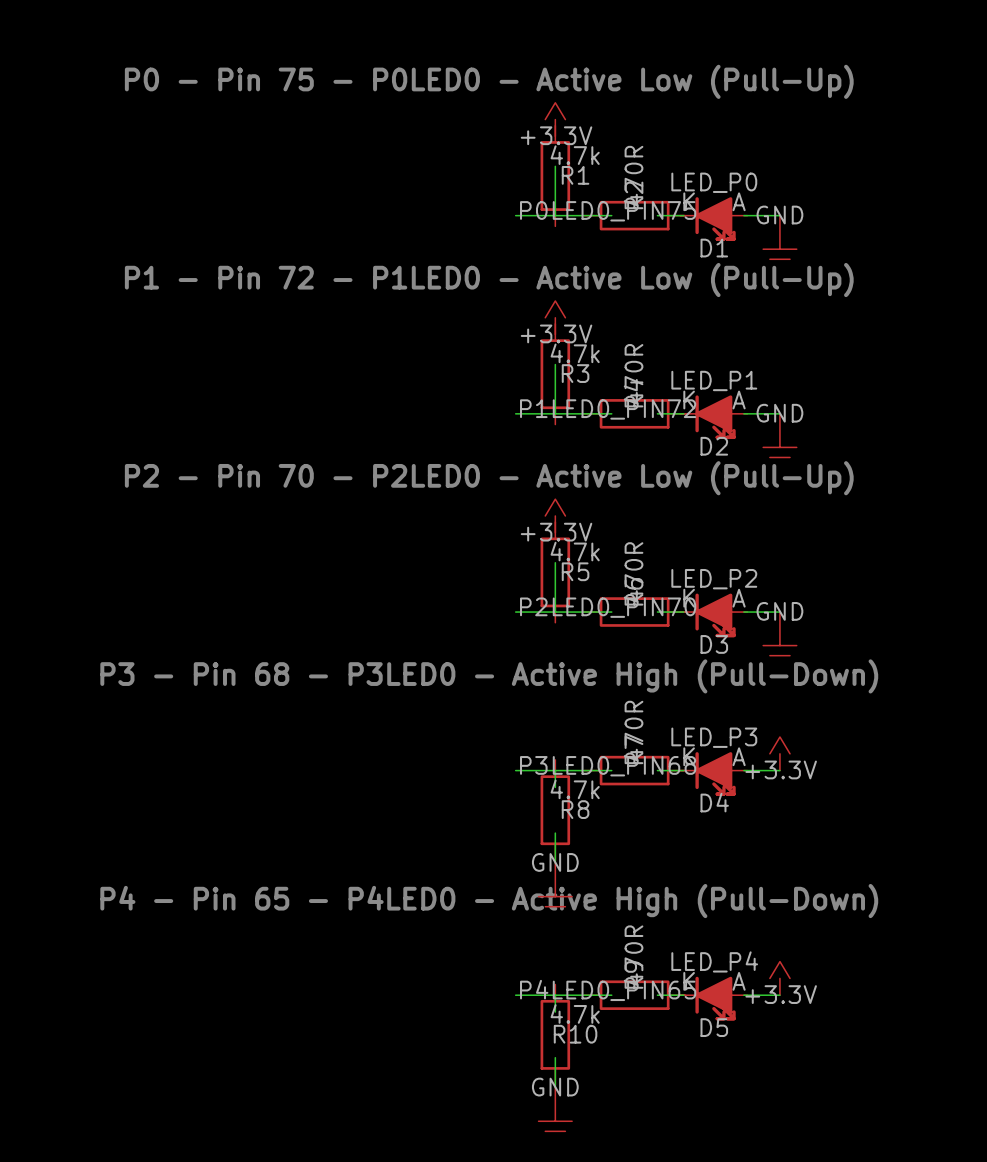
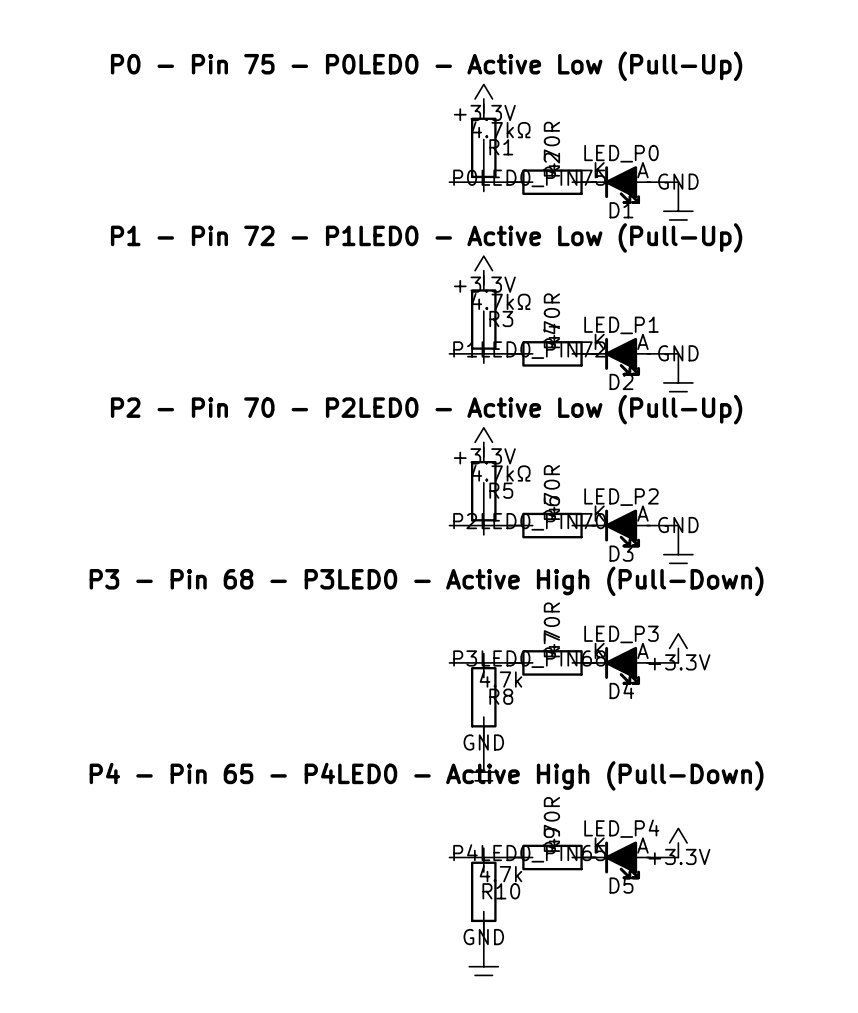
R1 value: 4.7k (575, 155) -> 4.7kΩ (500, 129)
R3 value: 4.7k (575, 353) -> 4.7kΩ (500, 301)
R5 value: 4.7k (575, 551) -> 4.7kΩ (500, 473)

